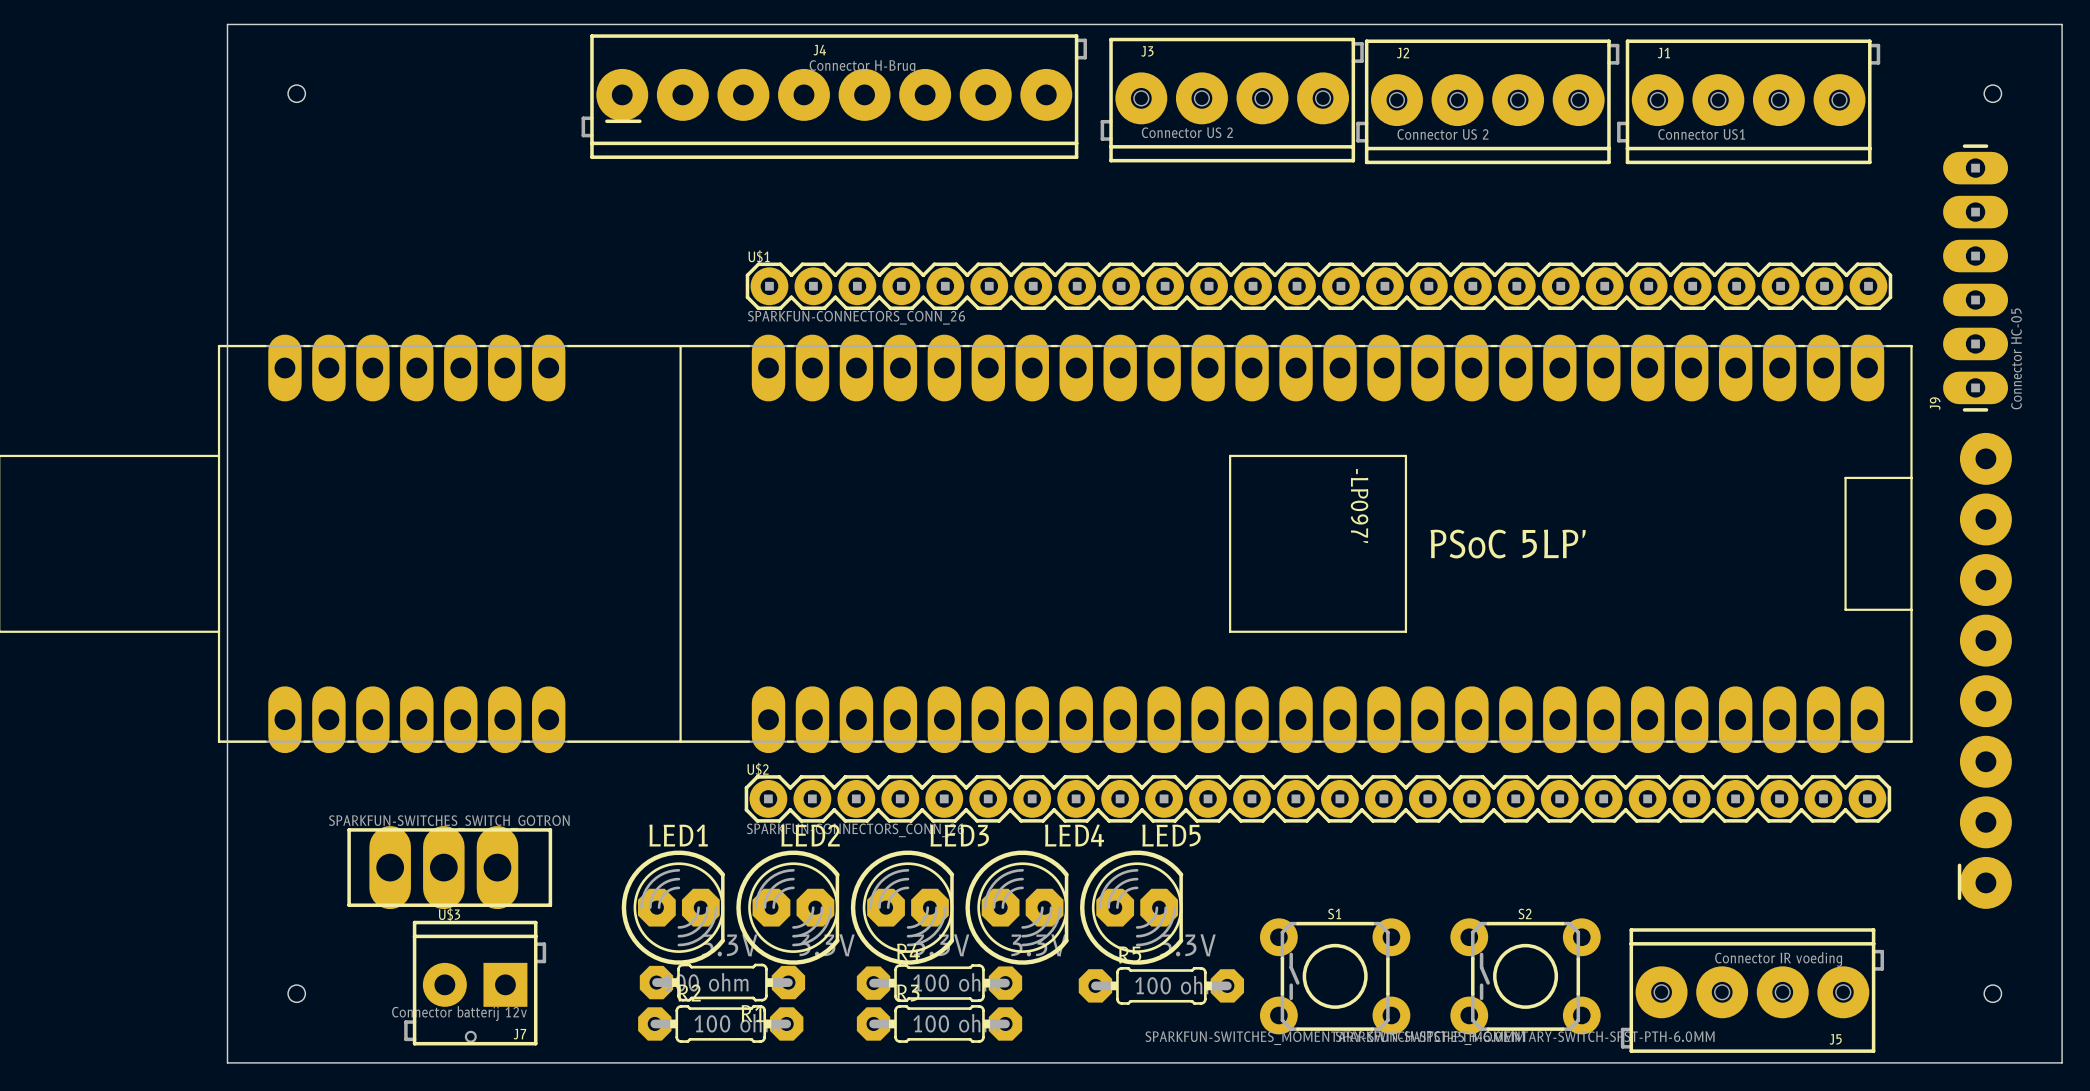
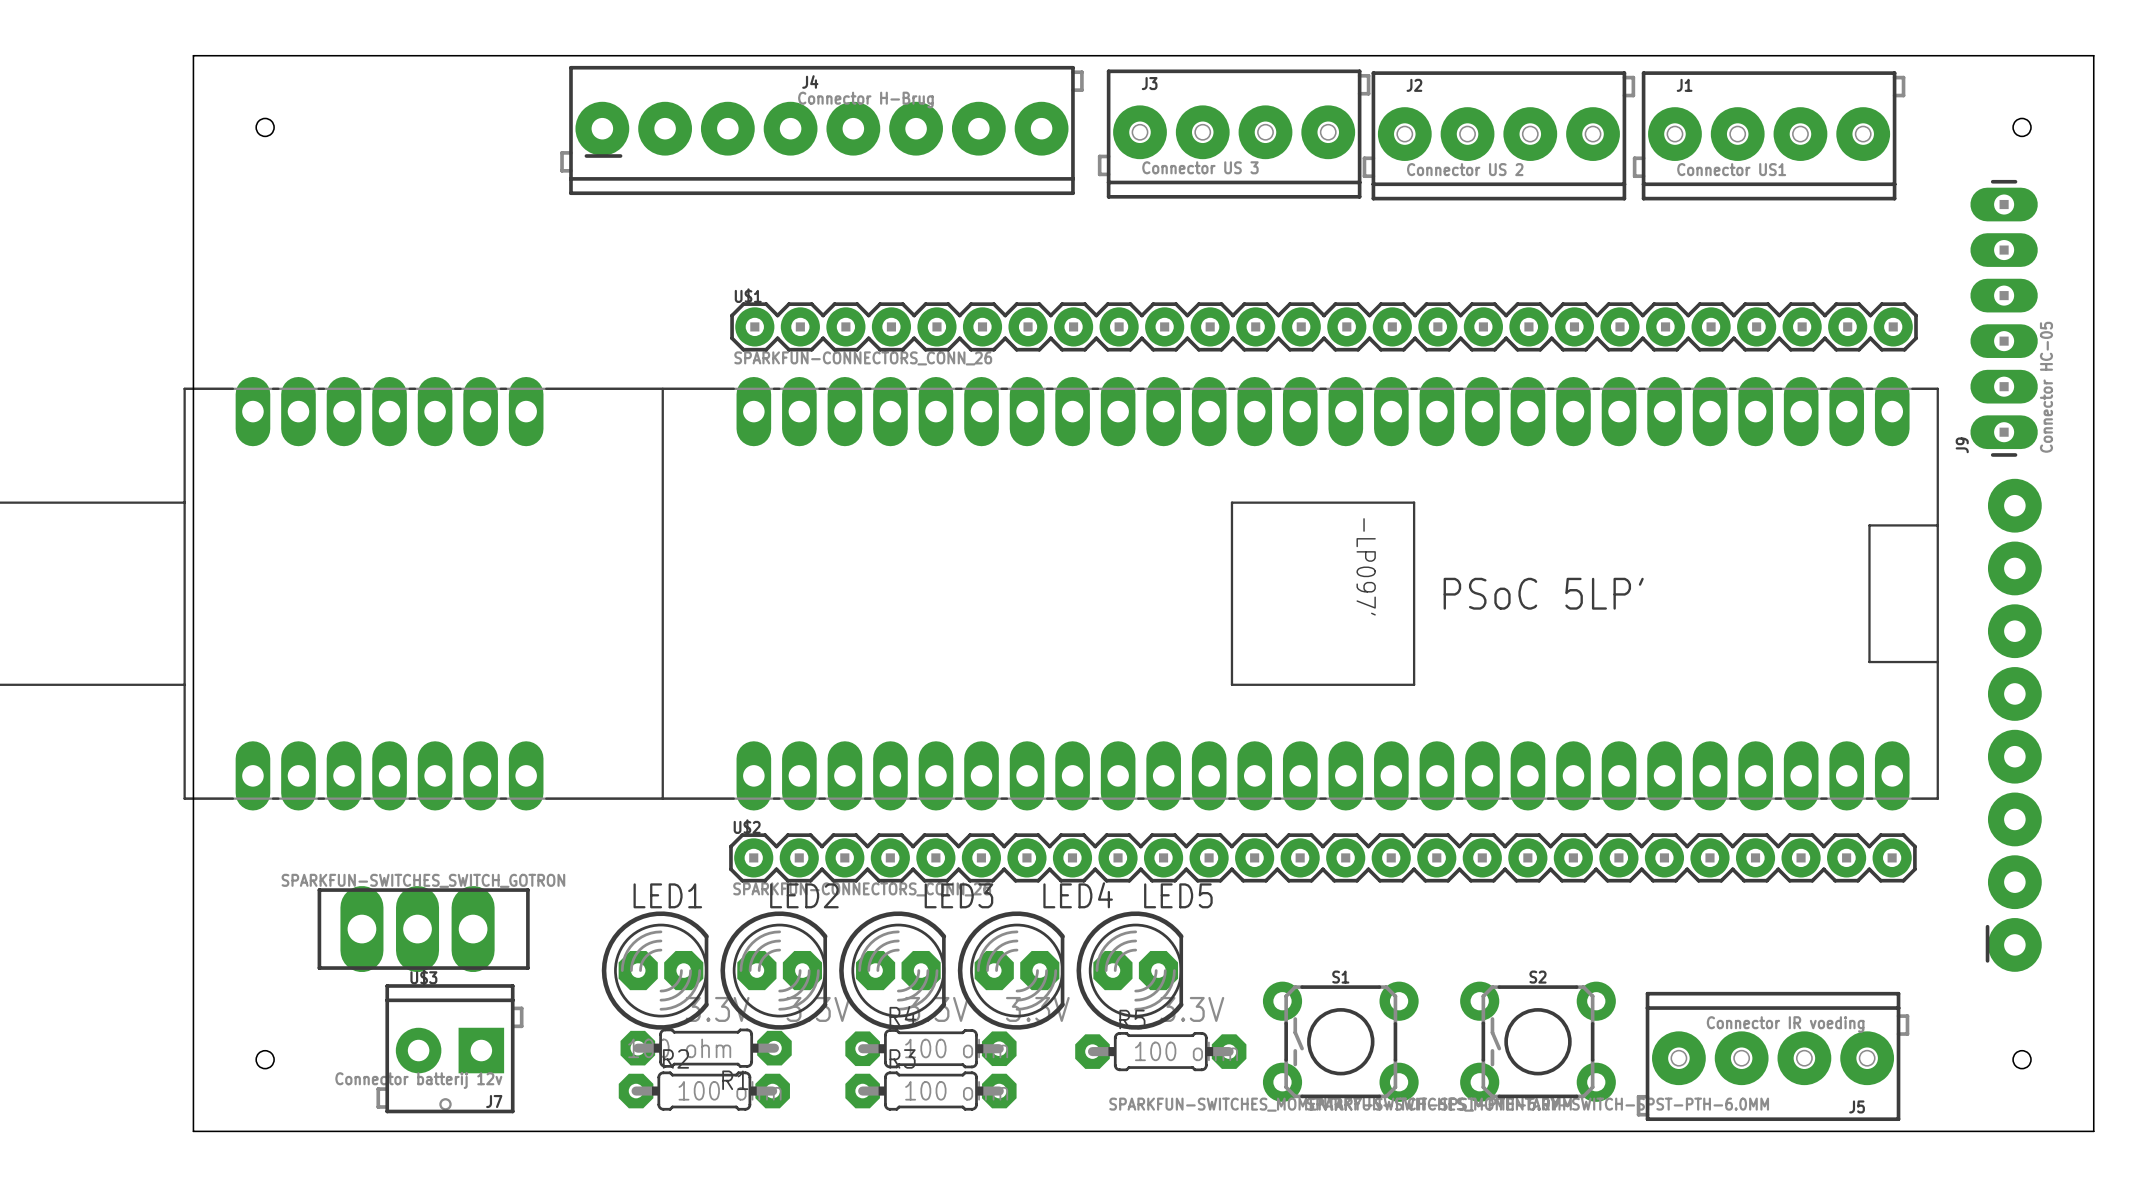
J3 value: Connector US 2 (1187, 132) -> Connector US 3 (1200, 167)

